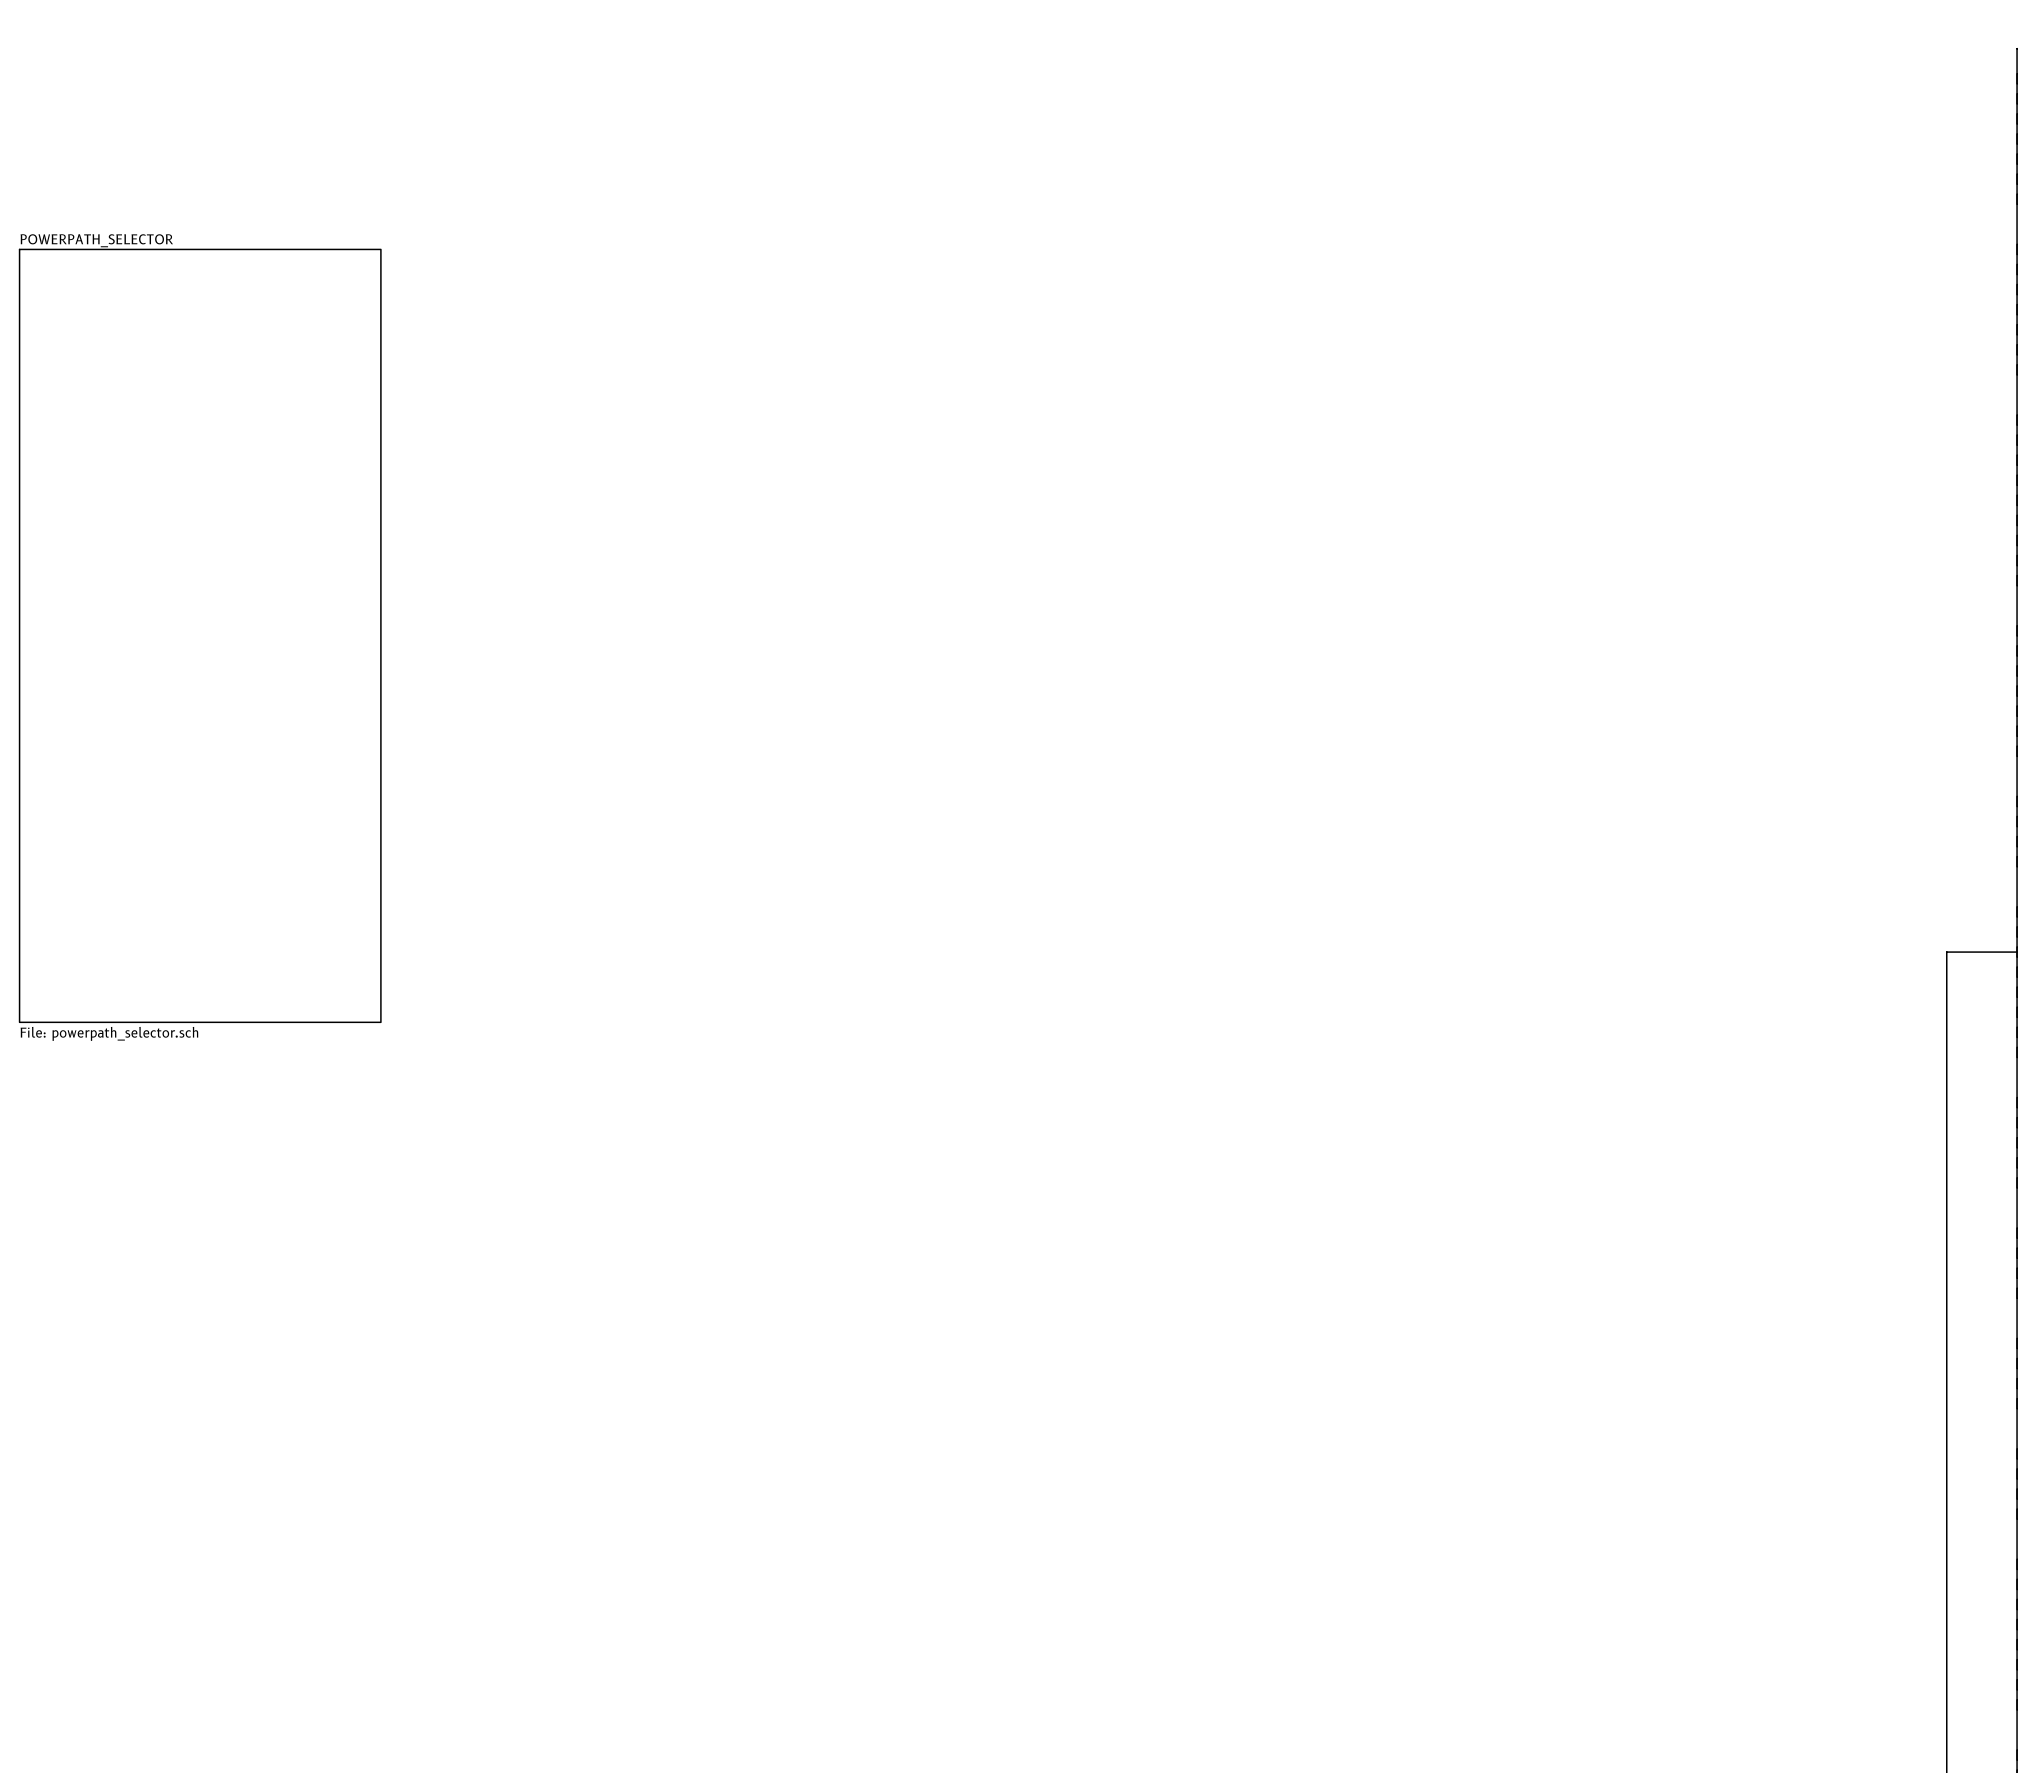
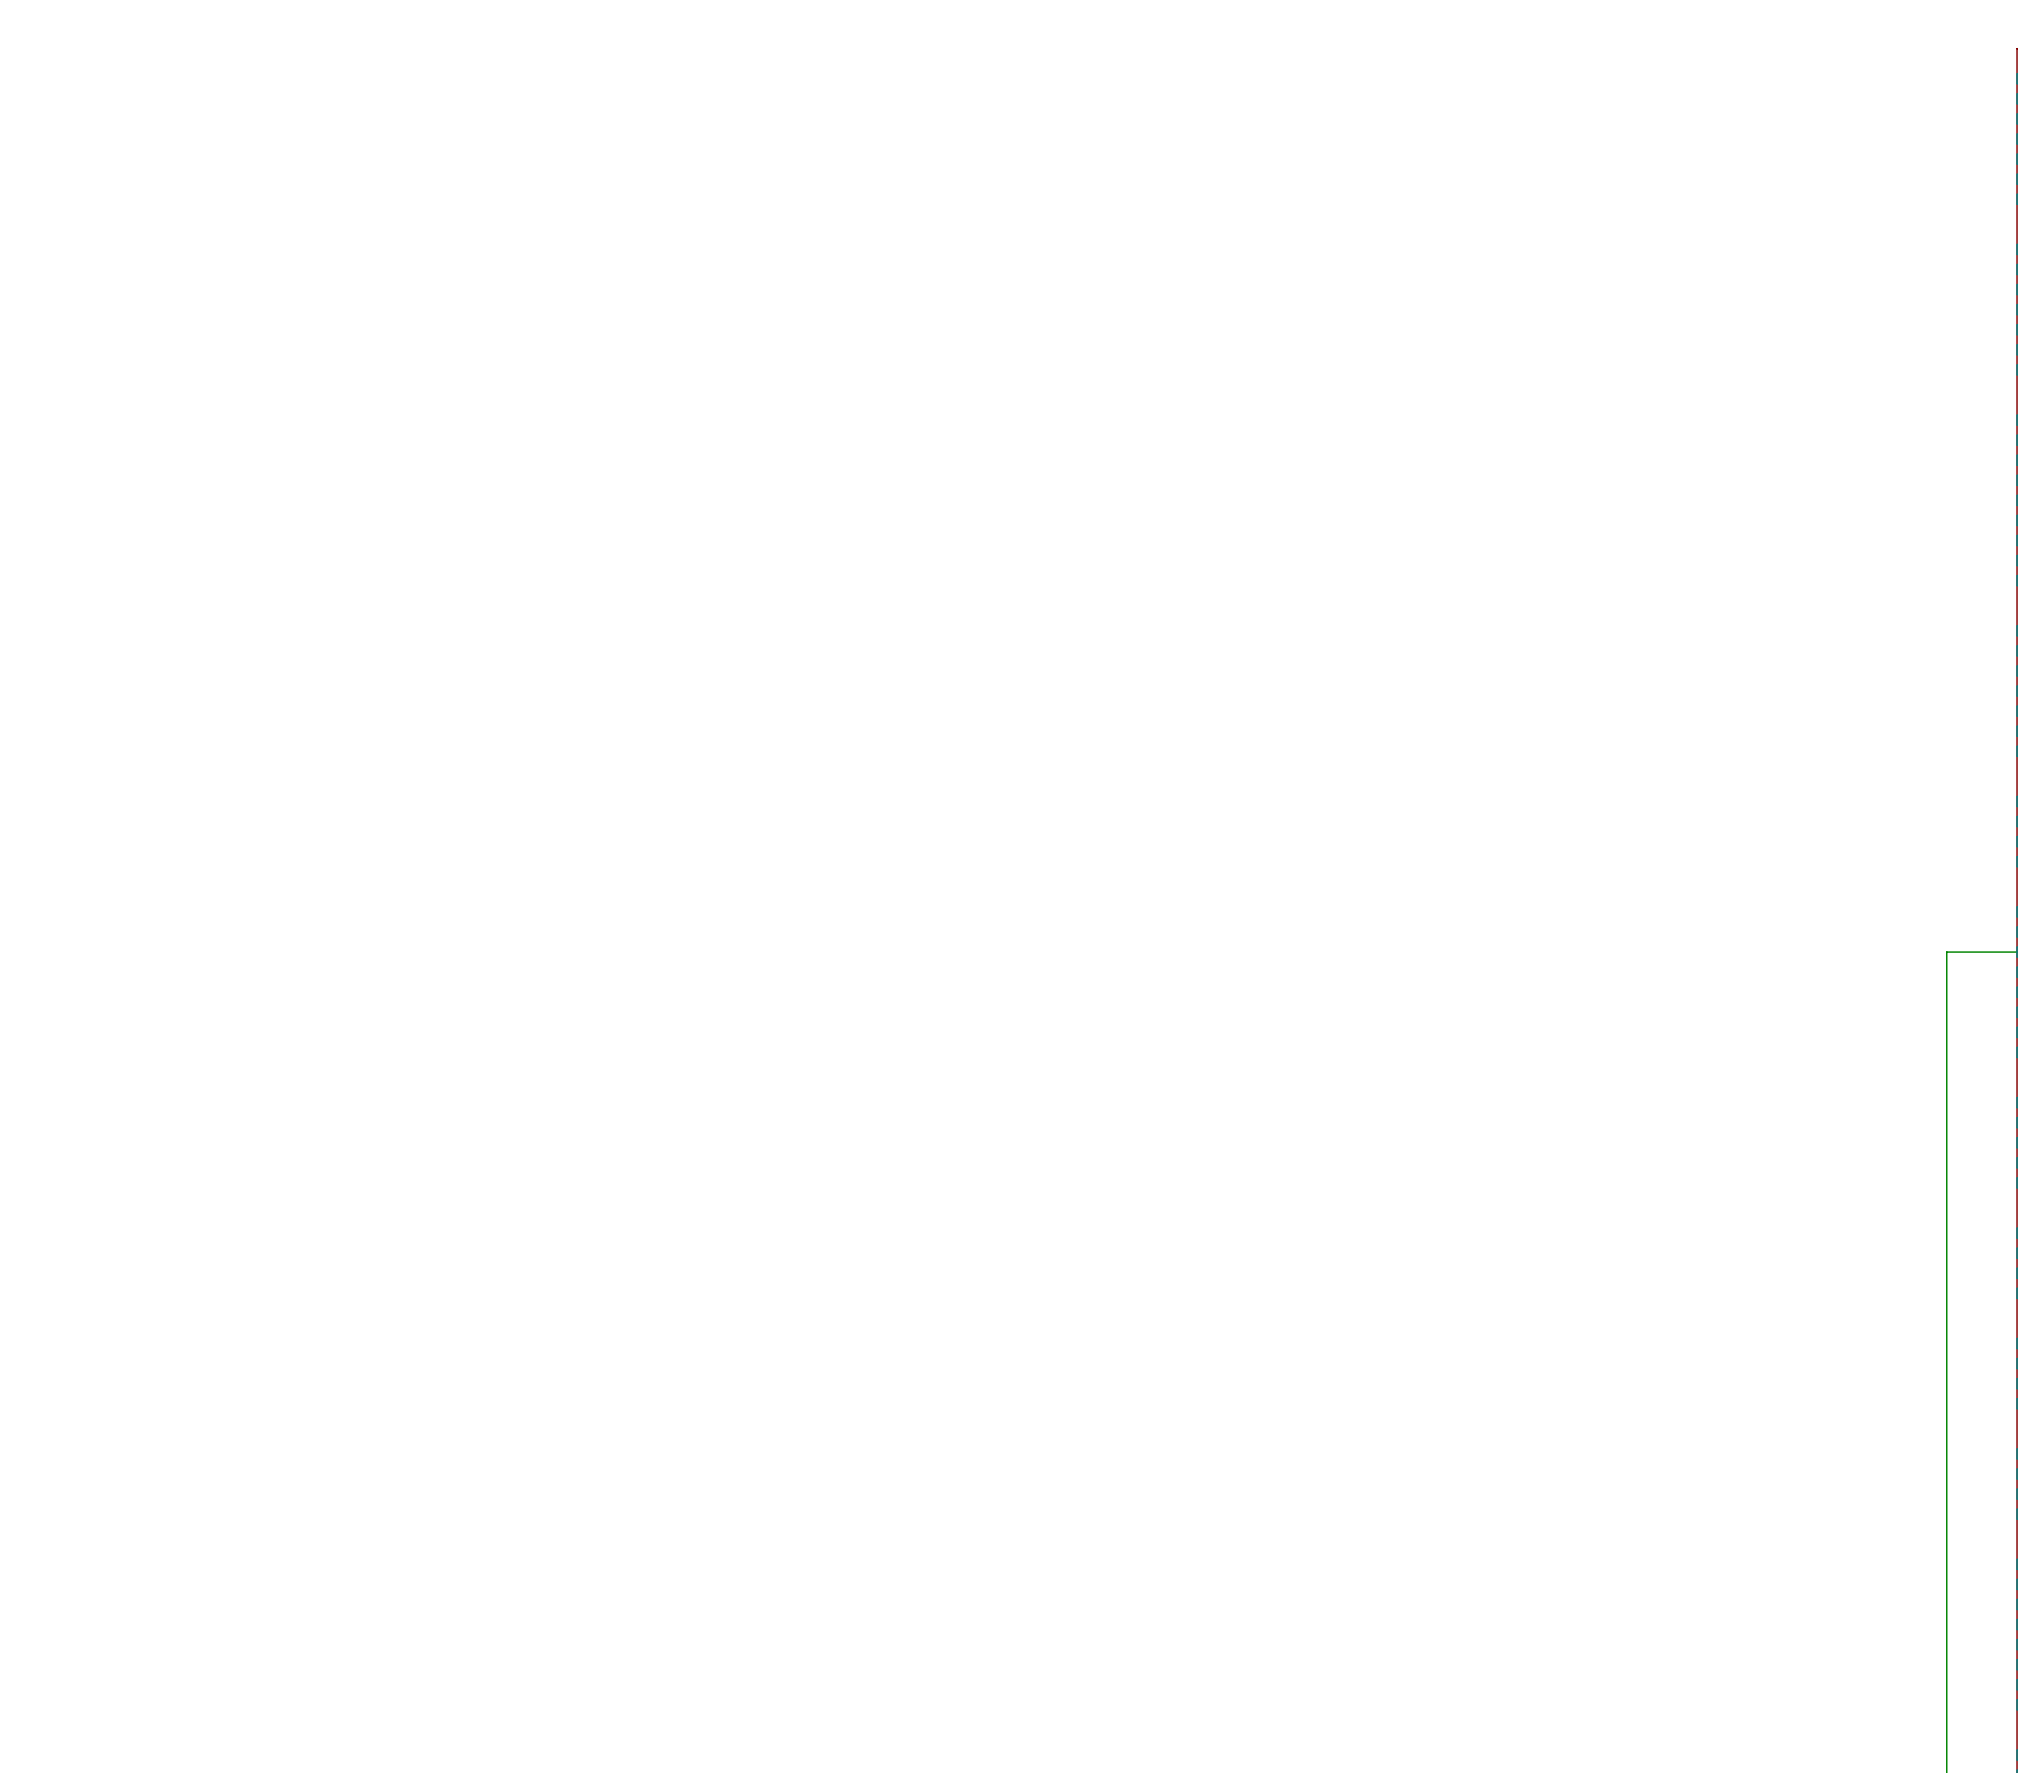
sheet POWERPATH_SELECTOR: File: powerpath_selector.sch (200, 635) -> none

